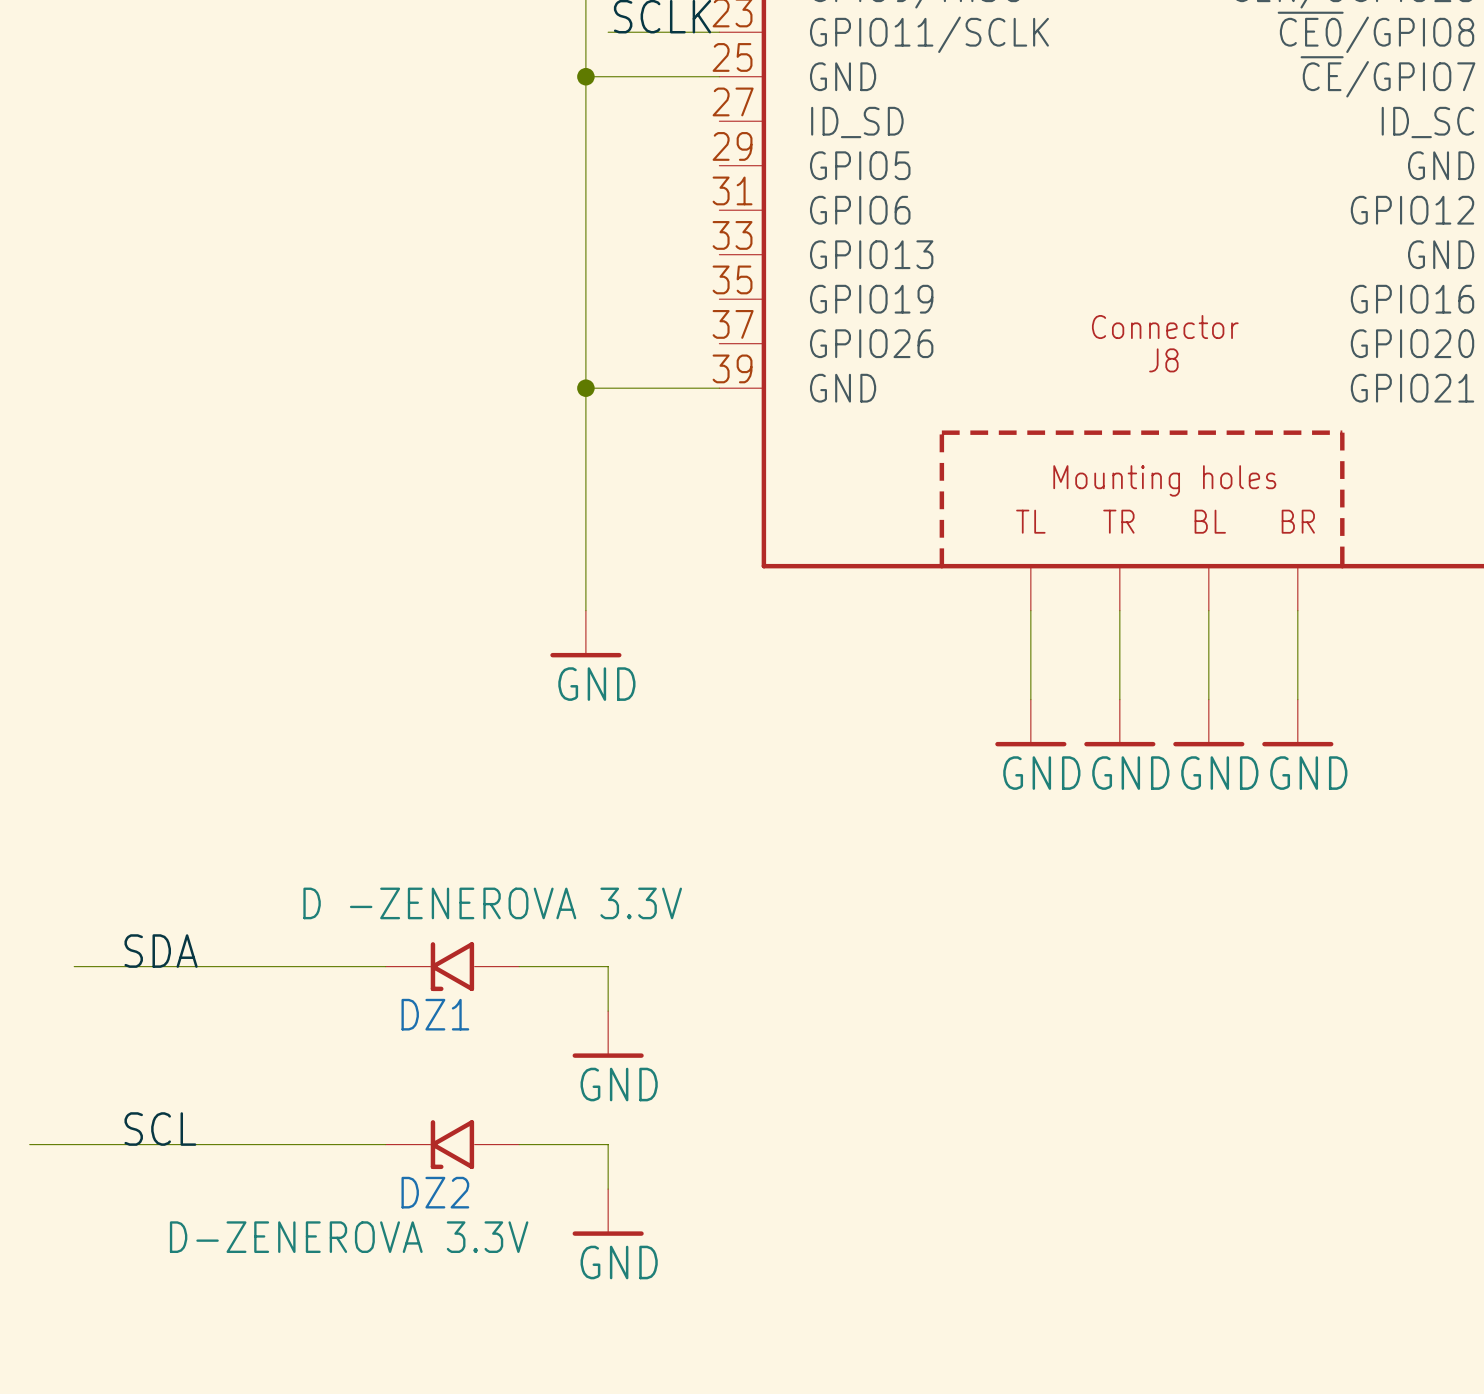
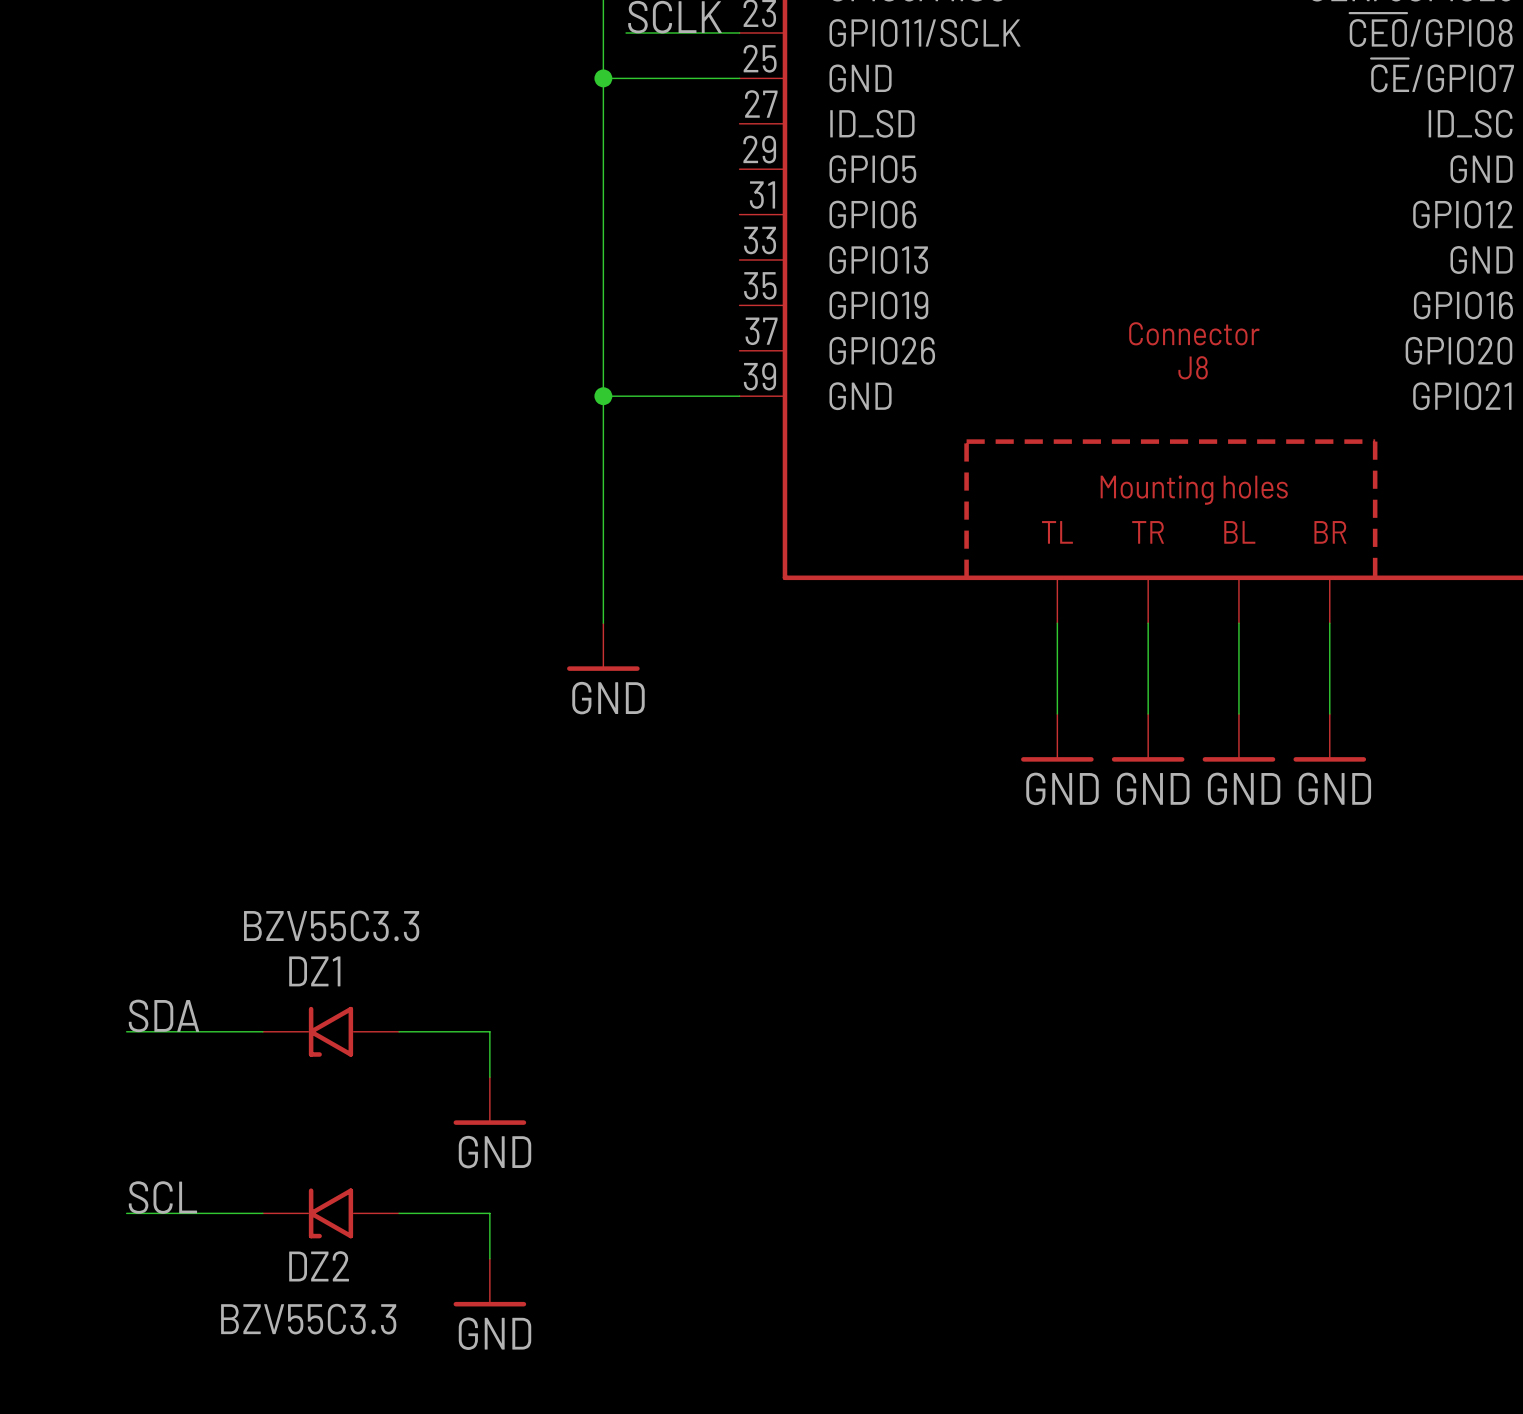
DZ1 value: D -ZENEROVA 3.3V (492, 903) -> BZV55C3.3 (331, 926)
label position: SDA (161, 951) -> SDA (163, 1015)
wire: (74, 966) (385, 966) -> none
DZ1 position: (452, 966) -> (330, 1031)
wire: (519, 966) (608, 966) (608, 1011) -> (399, 1031) (489, 1031) (489, 1077)
wire: none -> (126, 1031) (262, 1031)
DZ1 name position: DZ1 (435, 1014) -> DZ1 (314, 971)
power symbol: GND (608, 1034) -> none
power symbol: none -> GND (489, 1101)
label position: SCL (160, 1129) -> SCL (162, 1197)
wire: (29, 1144) (385, 1144) -> none
DZ2 position: (452, 1144) -> (330, 1213)
wire: (519, 1144) (608, 1144) (608, 1189) -> (399, 1213) (489, 1213) (489, 1258)
wire: none -> (126, 1213) (262, 1213)
DZ2 name position: DZ2 (435, 1192) -> DZ2 (319, 1266)
power symbol: GND (608, 1212) -> none
DZ2 value: D-ZENEROVA 3.3V (349, 1237) -> BZV55C3.3 (308, 1319)
power symbol: none -> GND (489, 1282)

